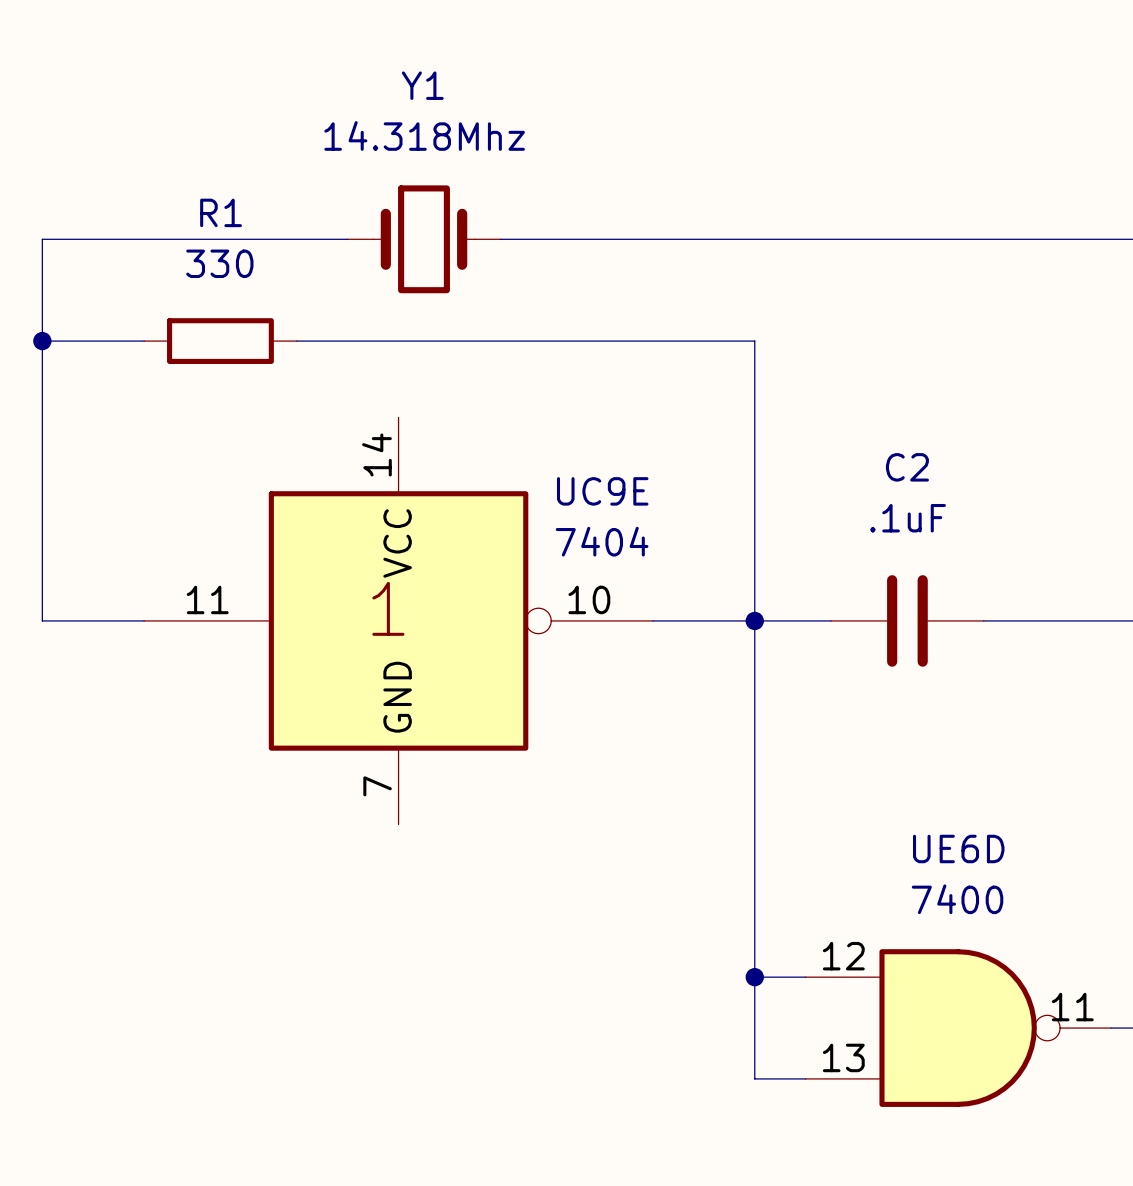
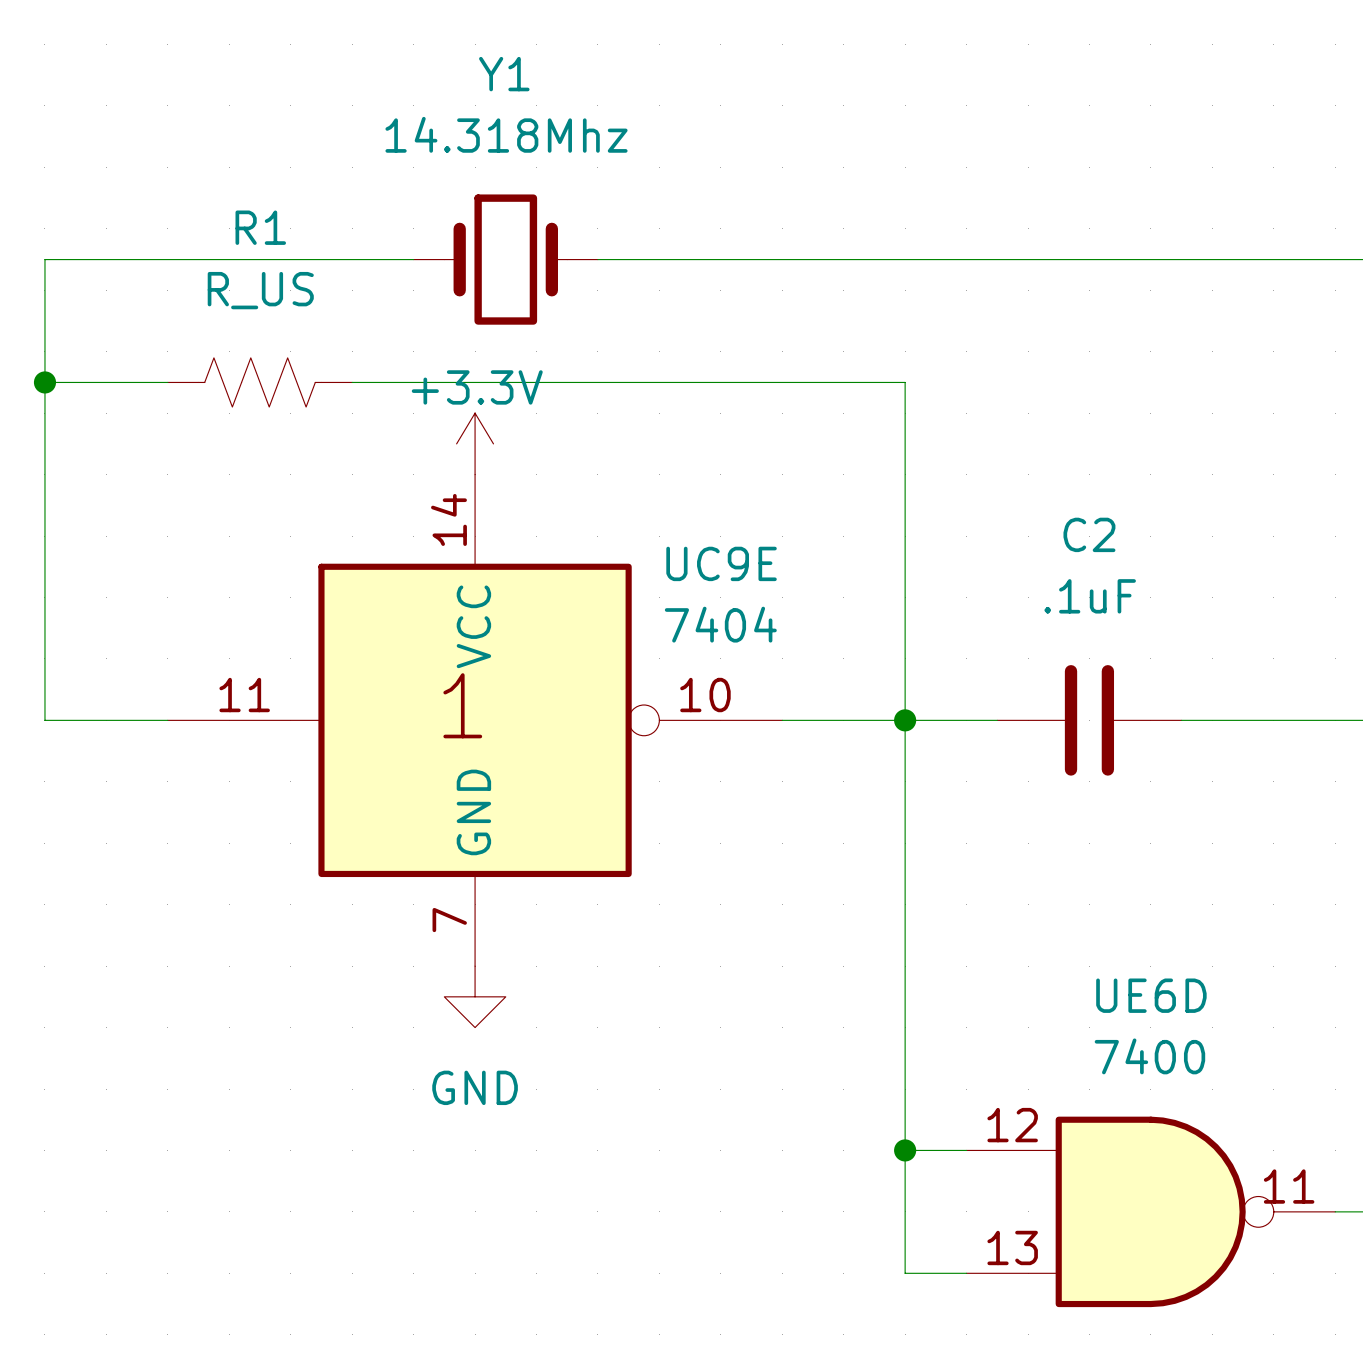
R1 value: 330 (219, 263) -> R_US (260, 290)
R1 symbol: [144, 318, 297, 364] -> [167, 357, 353, 408]
power symbol: none -> +3.3V (475, 443)
power symbol: none -> GND (475, 996)

